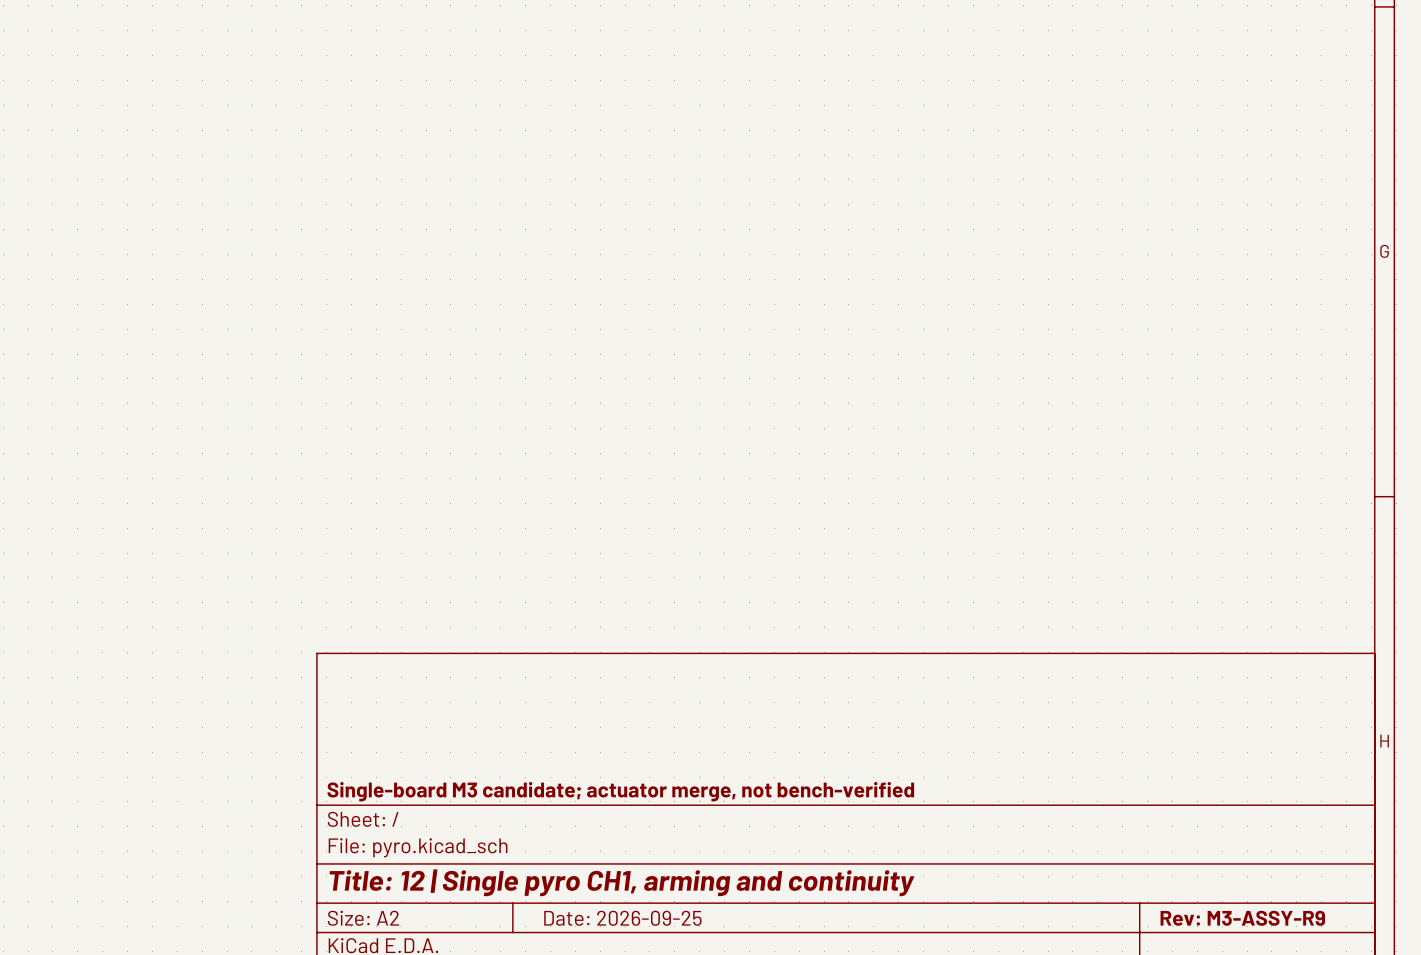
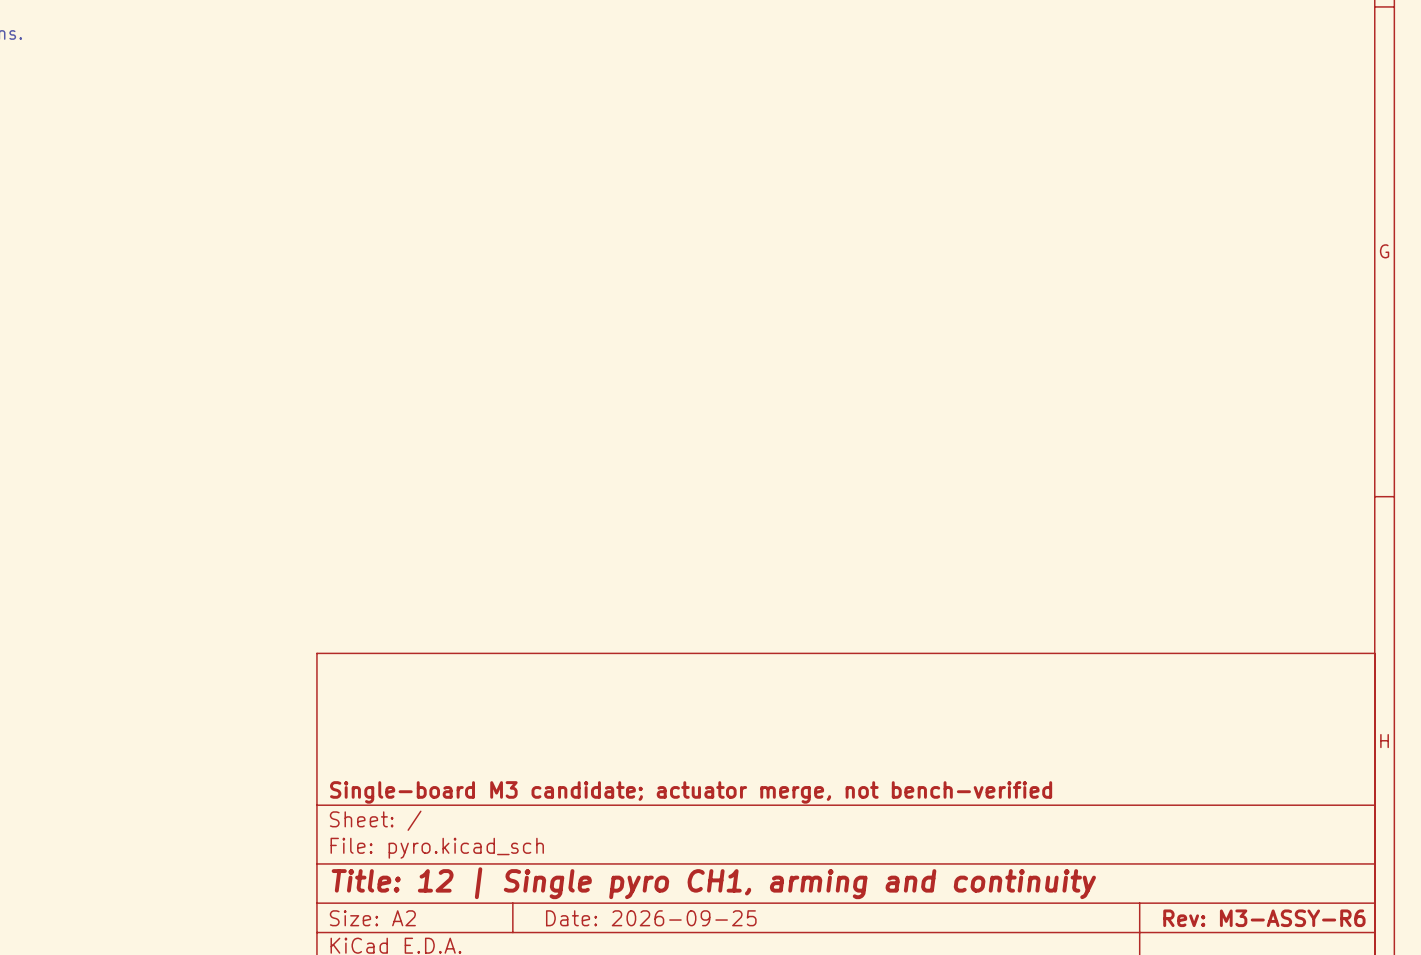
title block: Rev: M3-ASSY-R9 (1242, 918) -> Rev: M3-ASSY-R6 (1264, 918)

